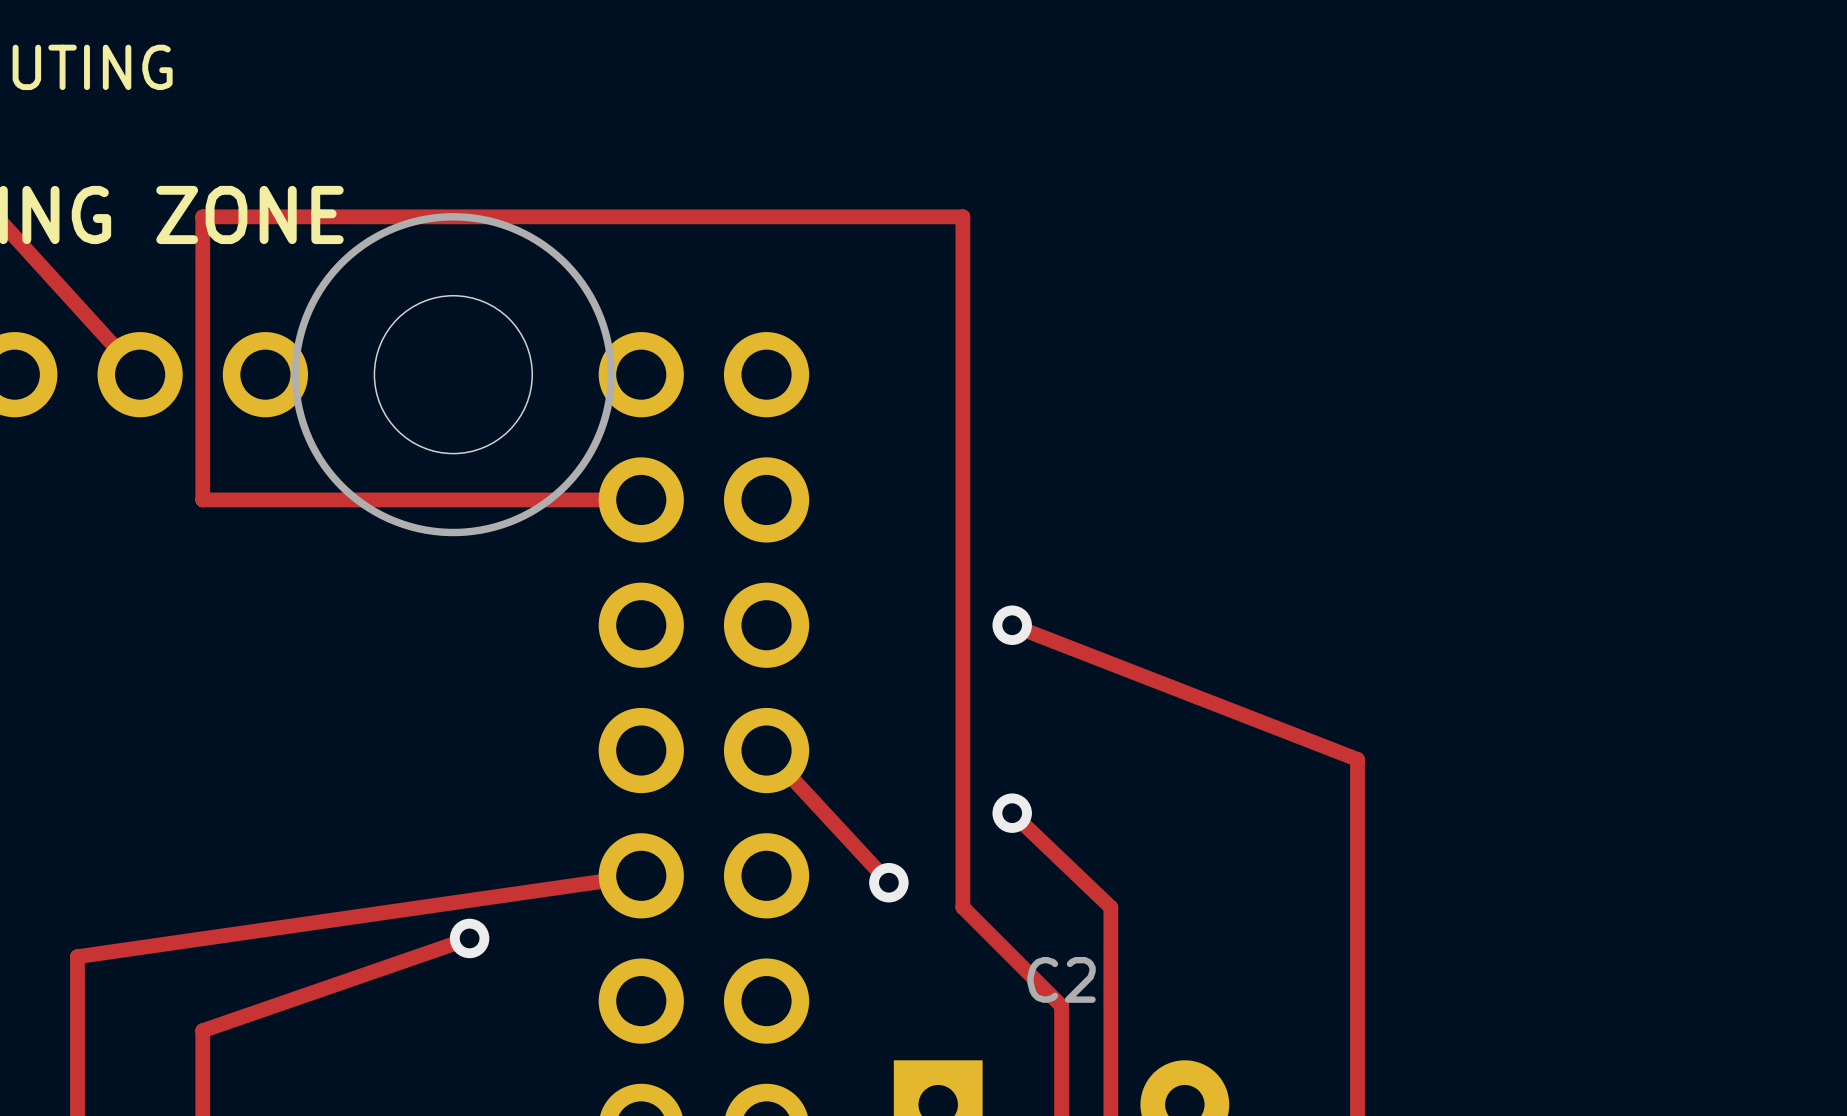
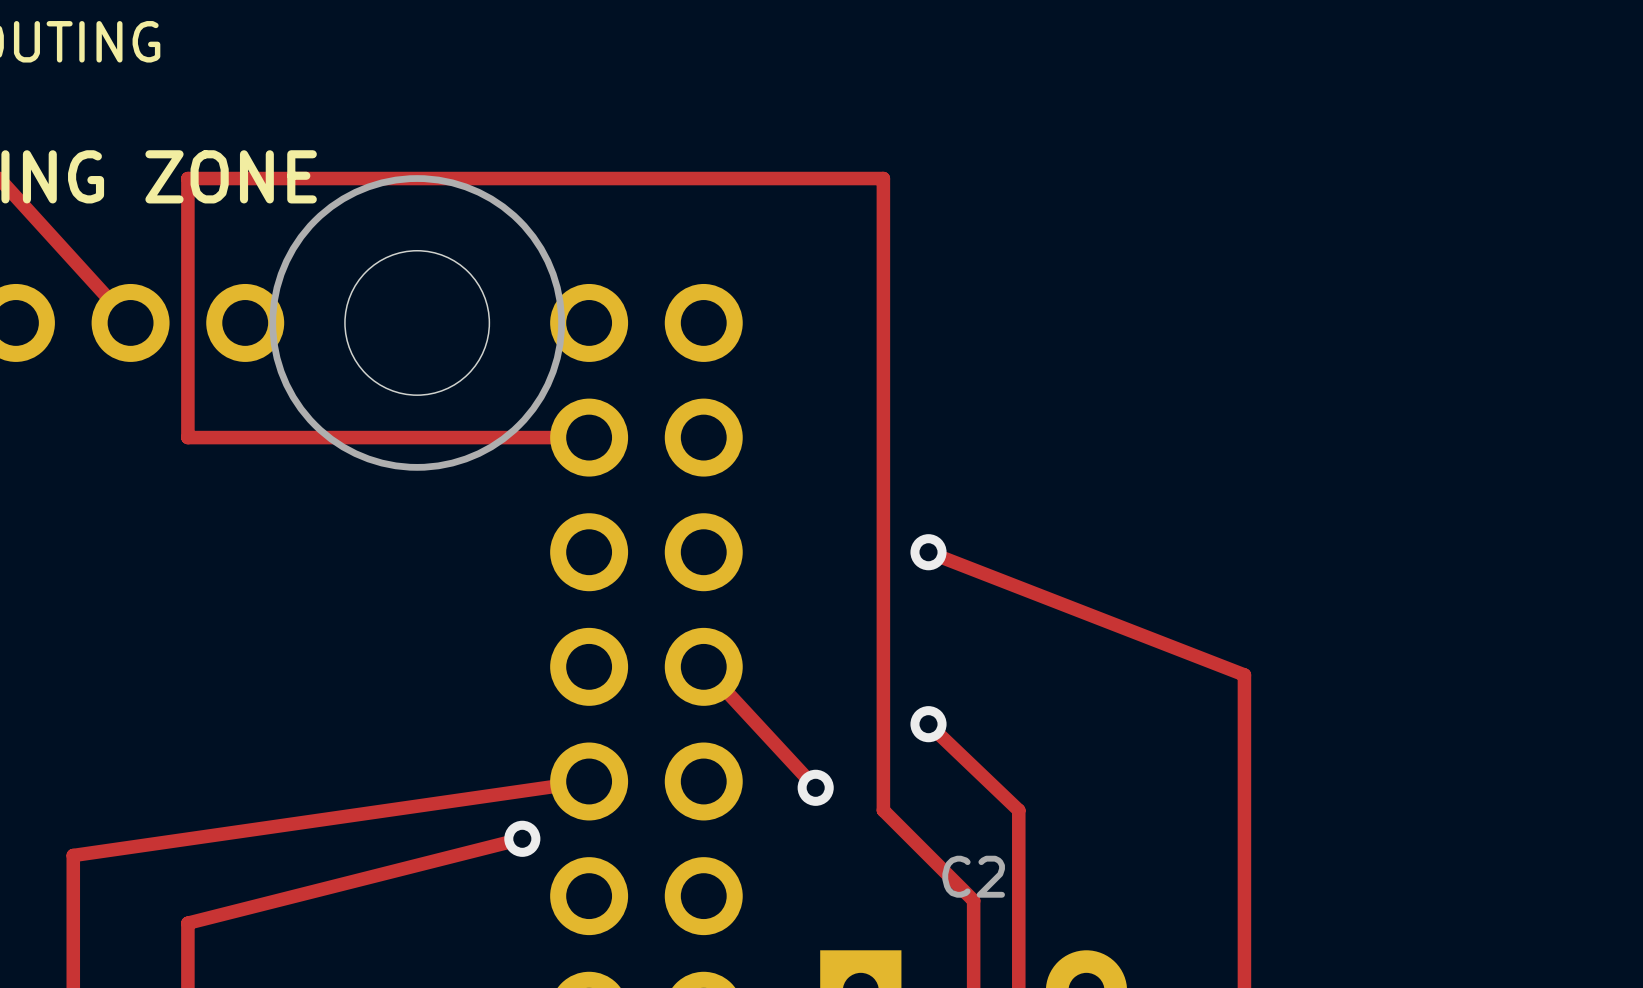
track: (469, 938) (202, 1030) -> (522, 838) (187, 923)
via position: (469, 938) -> (522, 838)

